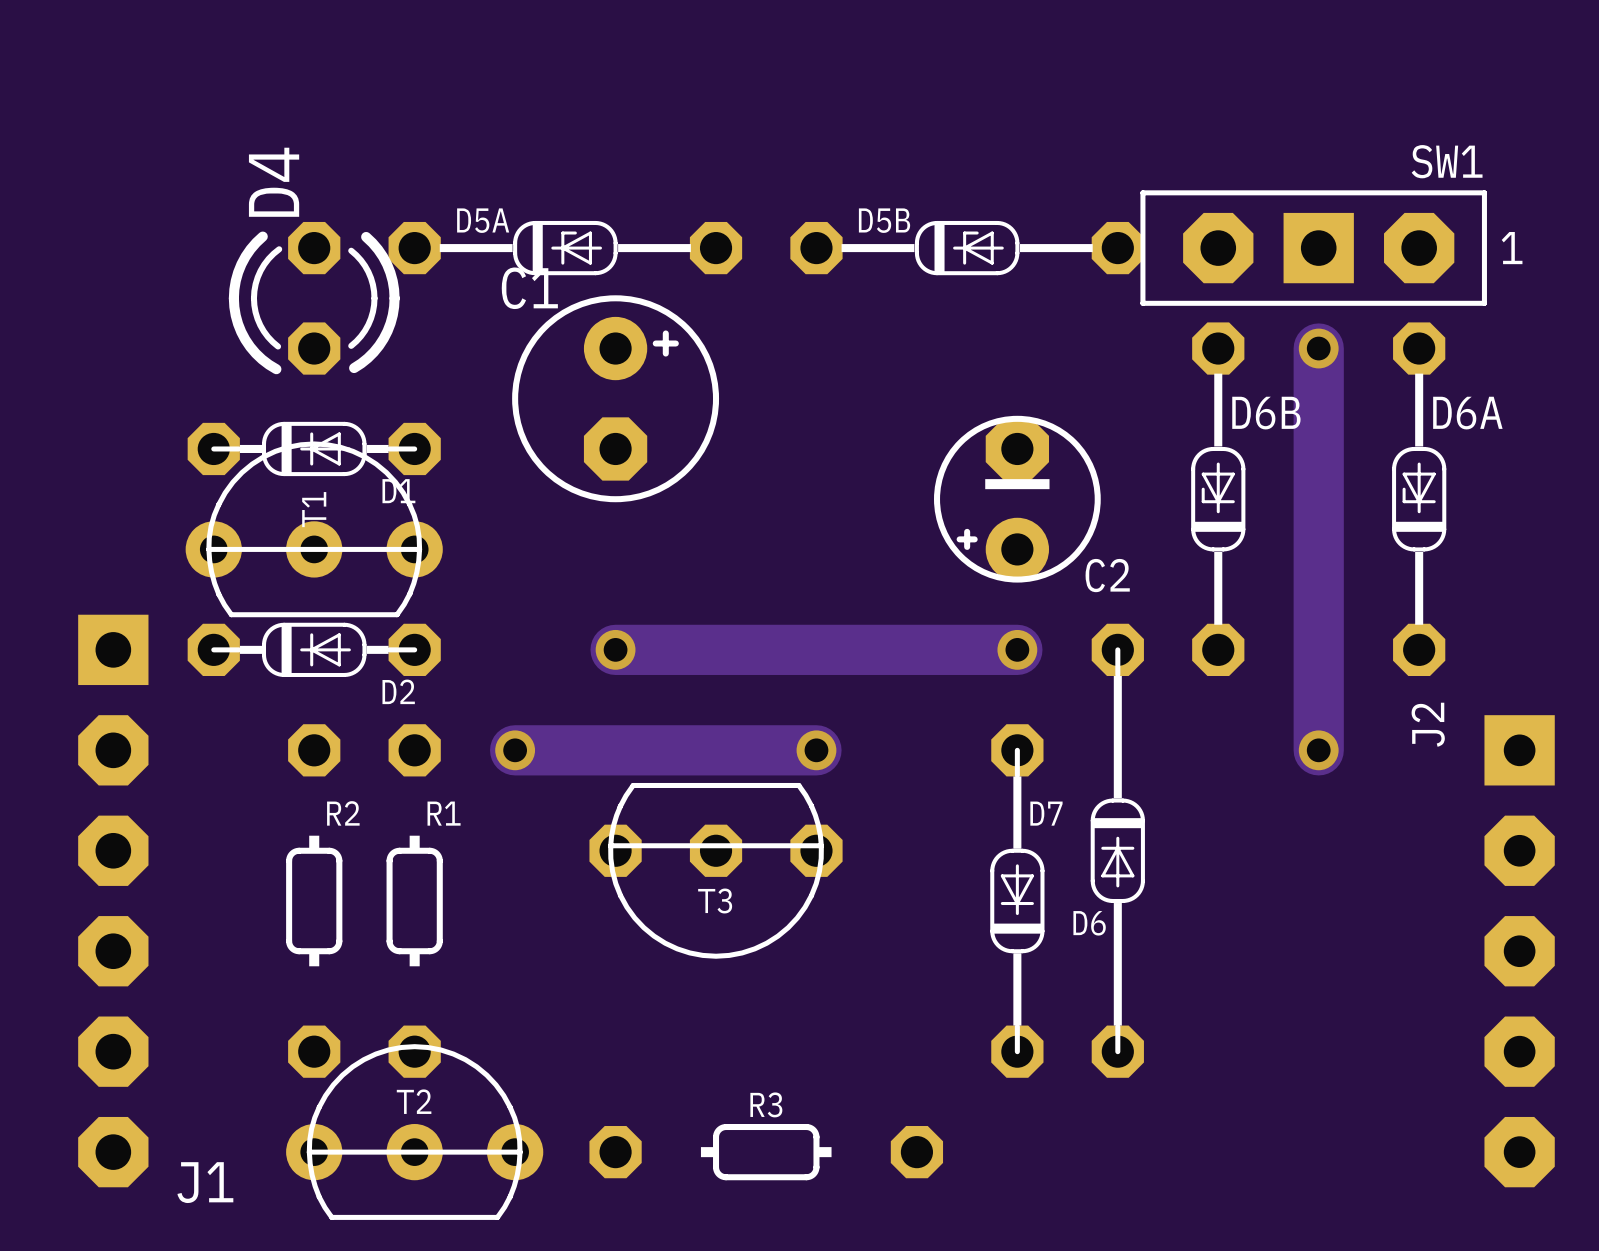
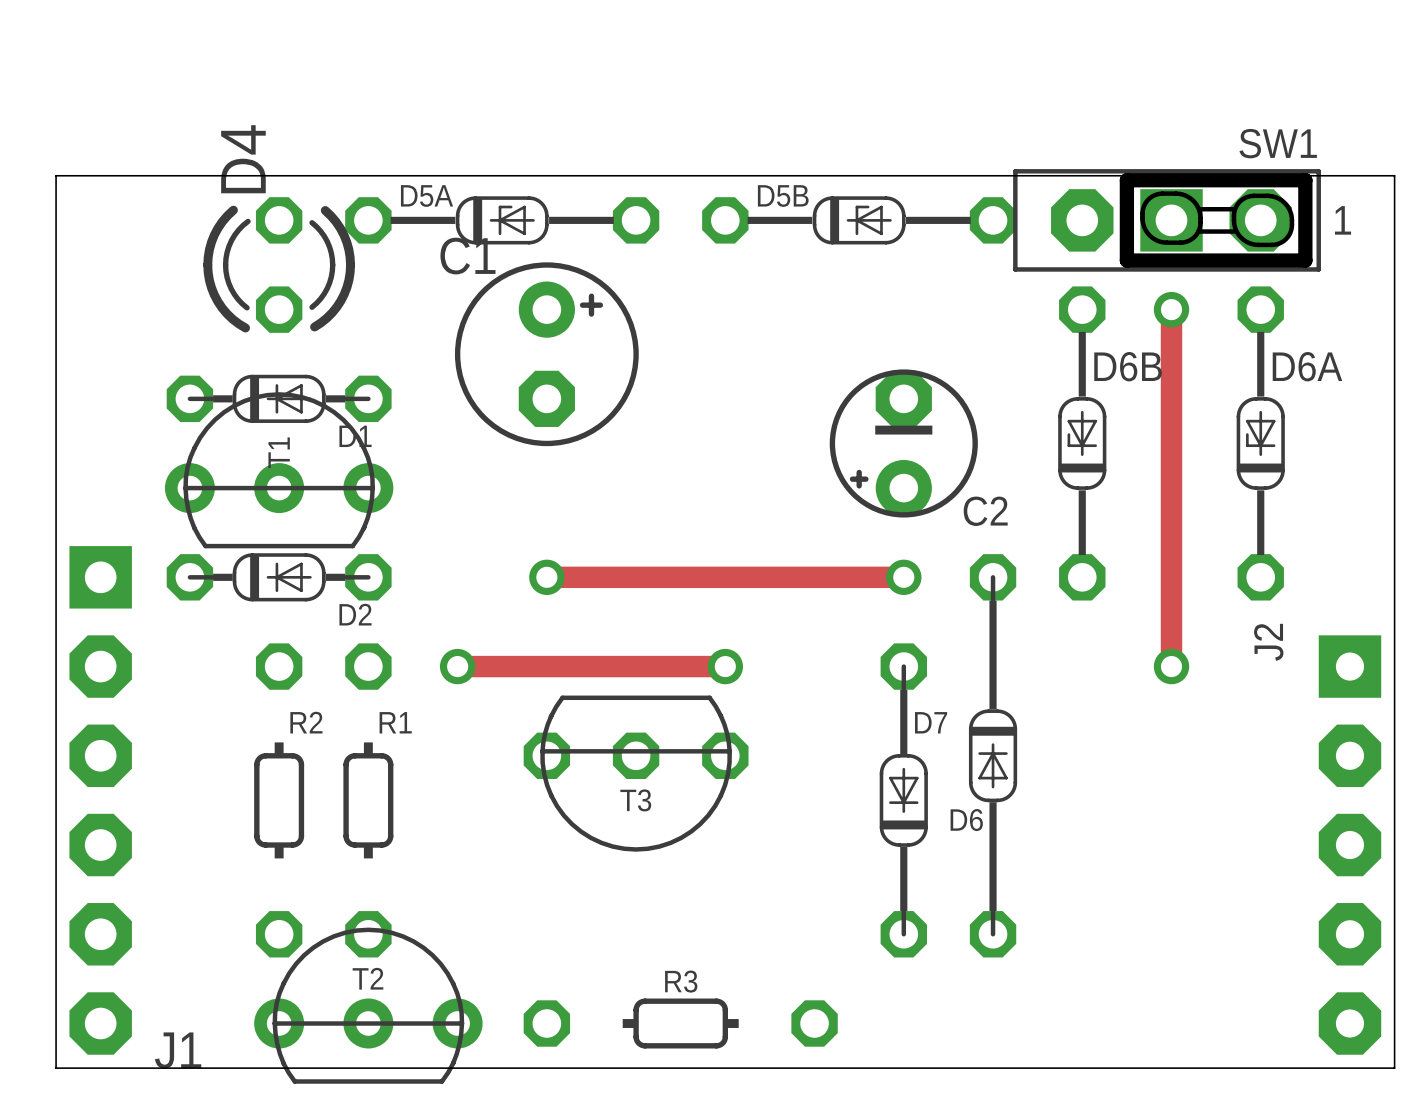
SW1 footprint: [1140, 190, 1487, 306] -> [1013, 169, 1321, 272]
board edge: none -> (56, 175) (1394, 175) (1394, 1068) (56, 1068) (56, 175)
track width: thick (1318, 348) (1318, 750) -> thin (1171, 309) (1171, 666)
track width: thick (615, 649) (1017, 649) -> thin (546, 577) (903, 577)
track width: thick (515, 750) (816, 750) -> thin (457, 666) (725, 666)

